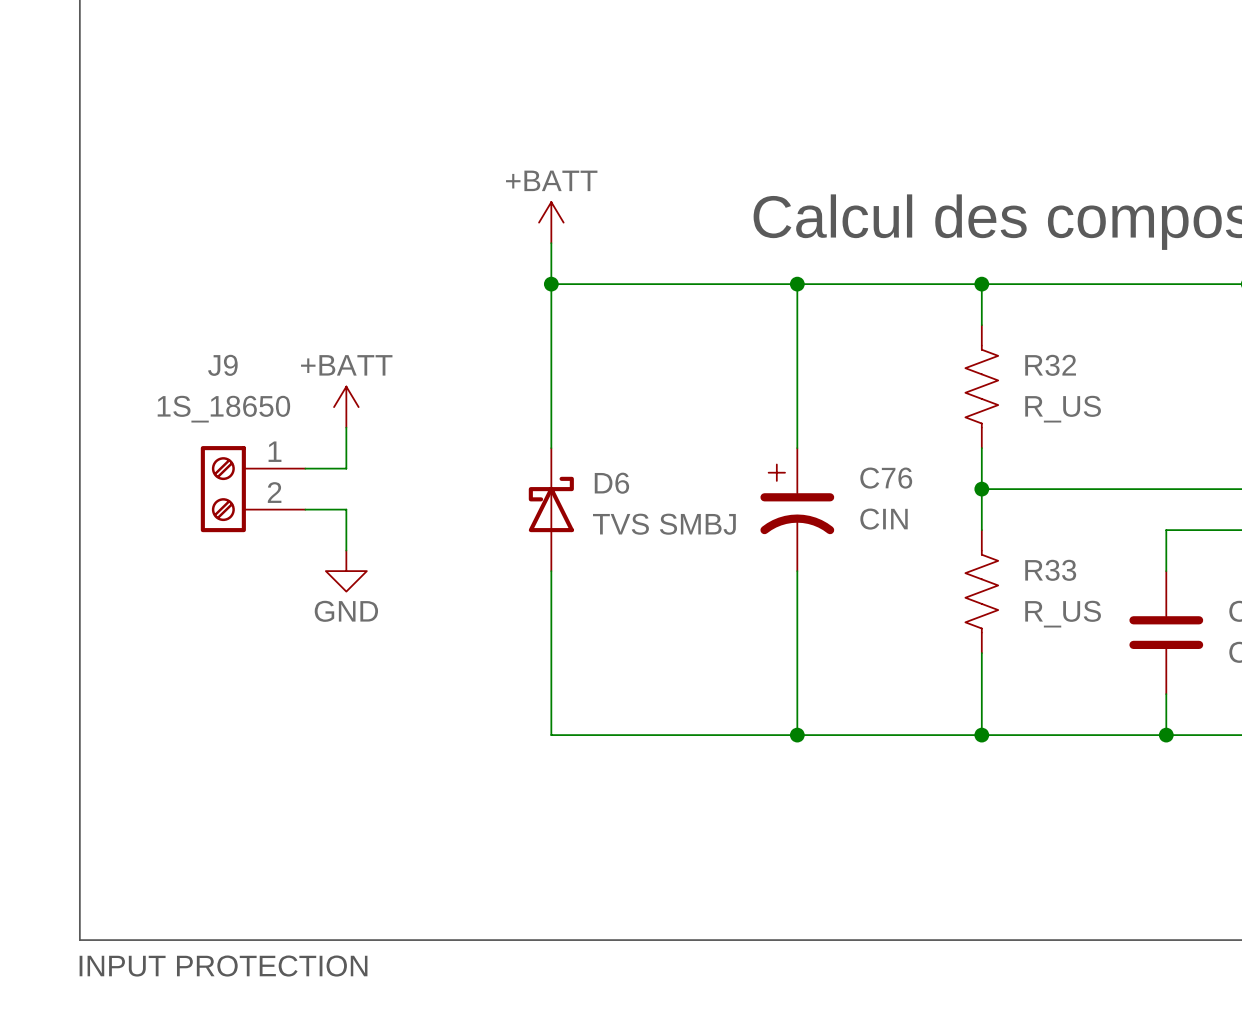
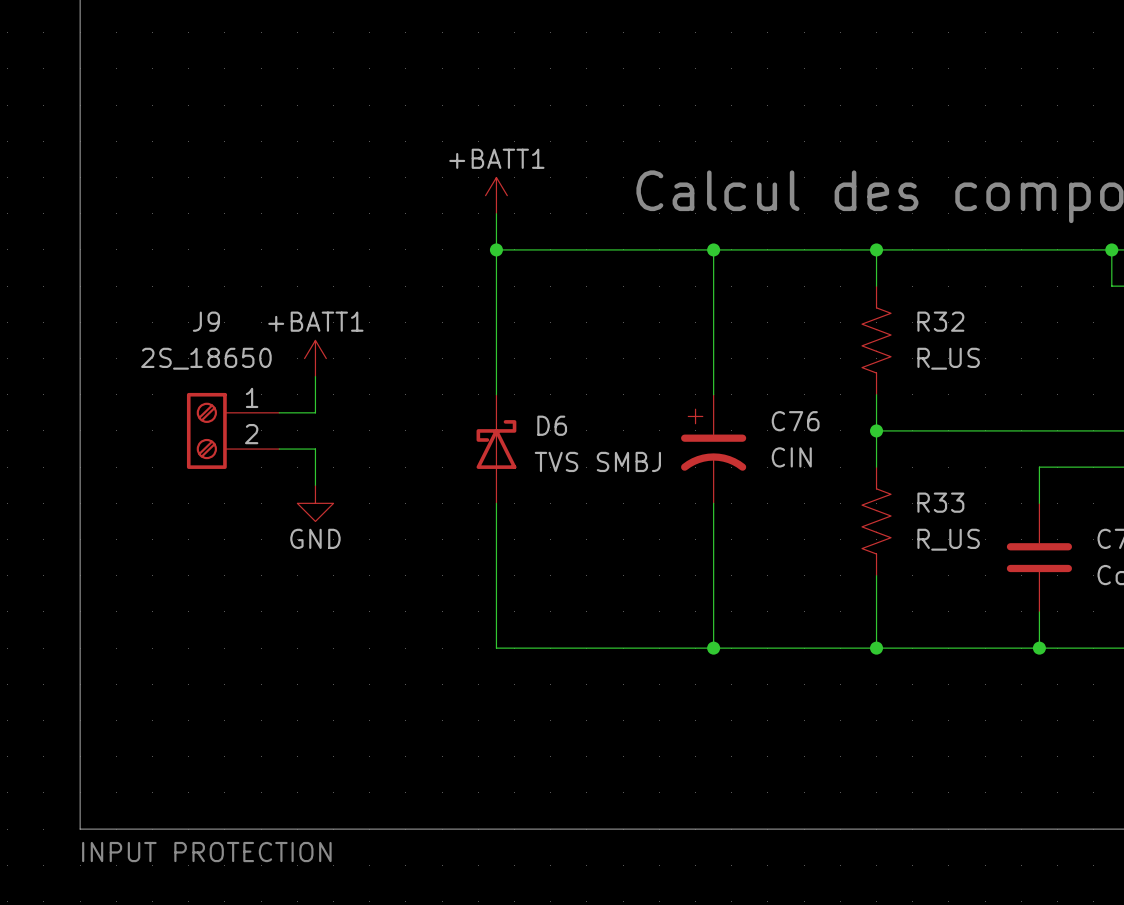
power symbol: +BATT (551, 222) -> +BATT1 (496, 195)
power symbol: +BATT (346, 407) -> +BATT1 (315, 358)
J9 value: 1S_18650 (223, 409) -> 2S_18650 (206, 358)

